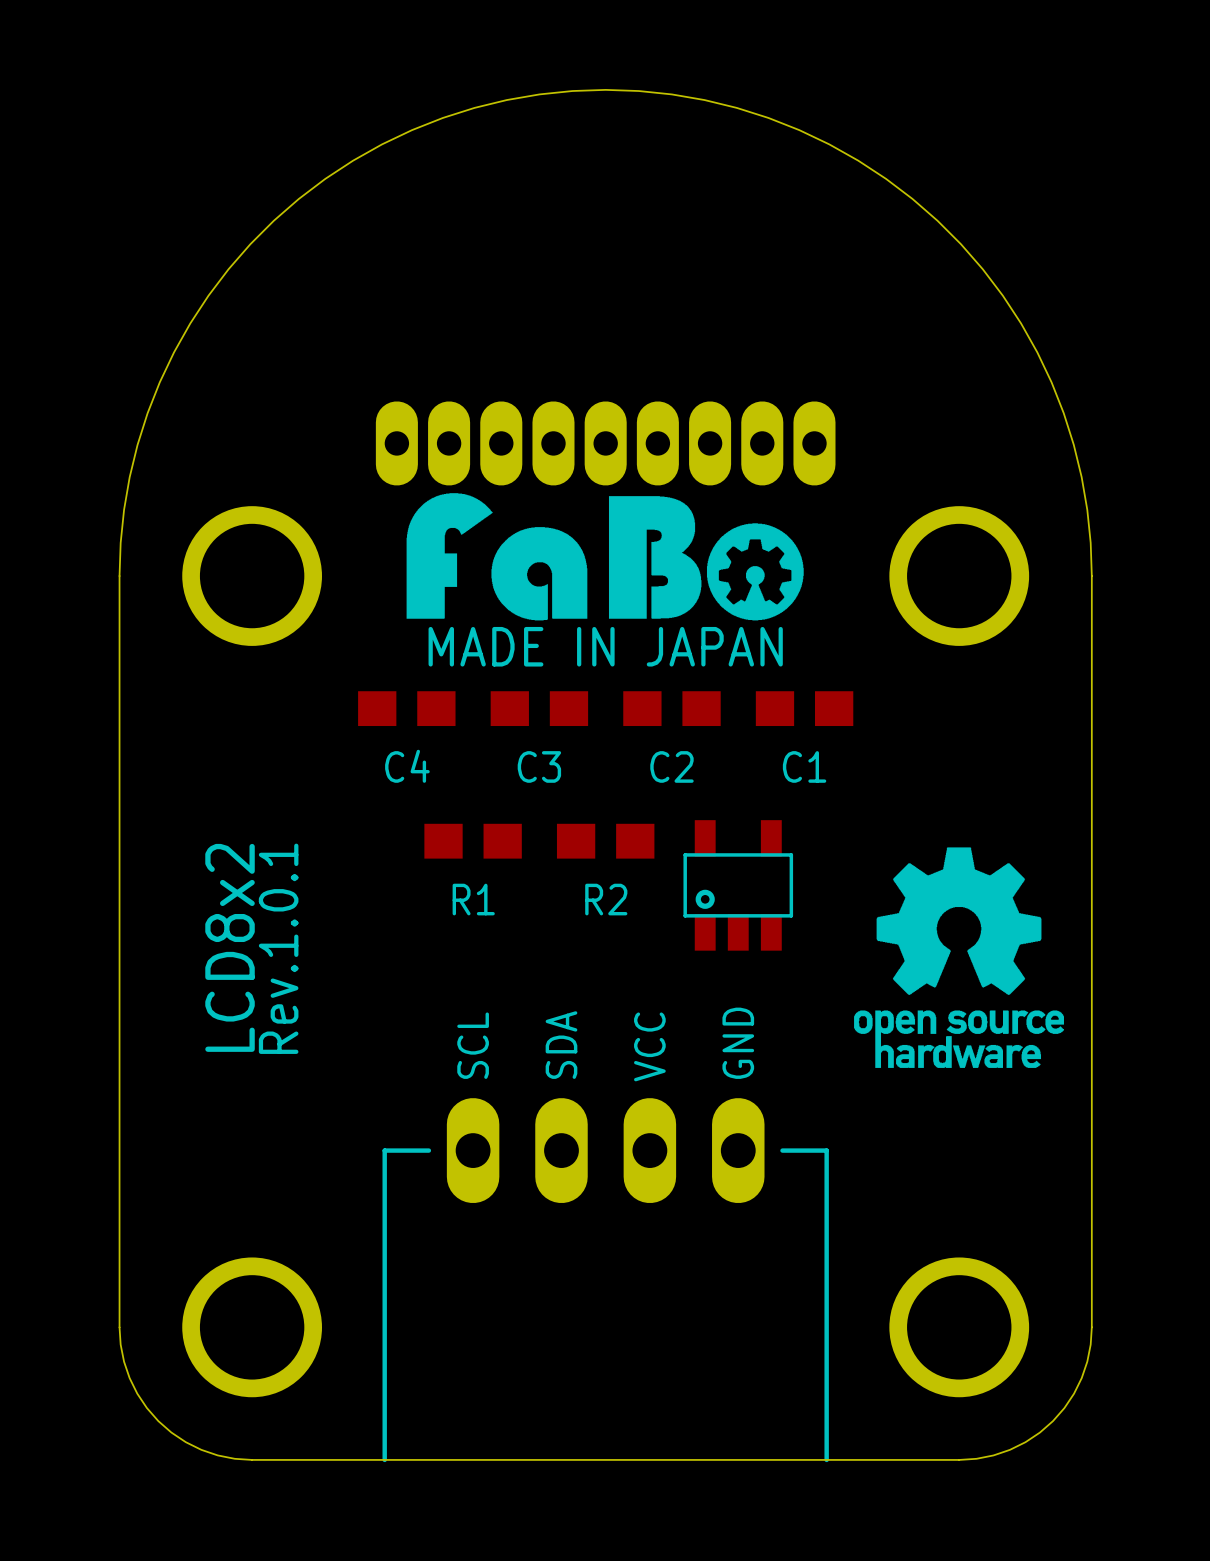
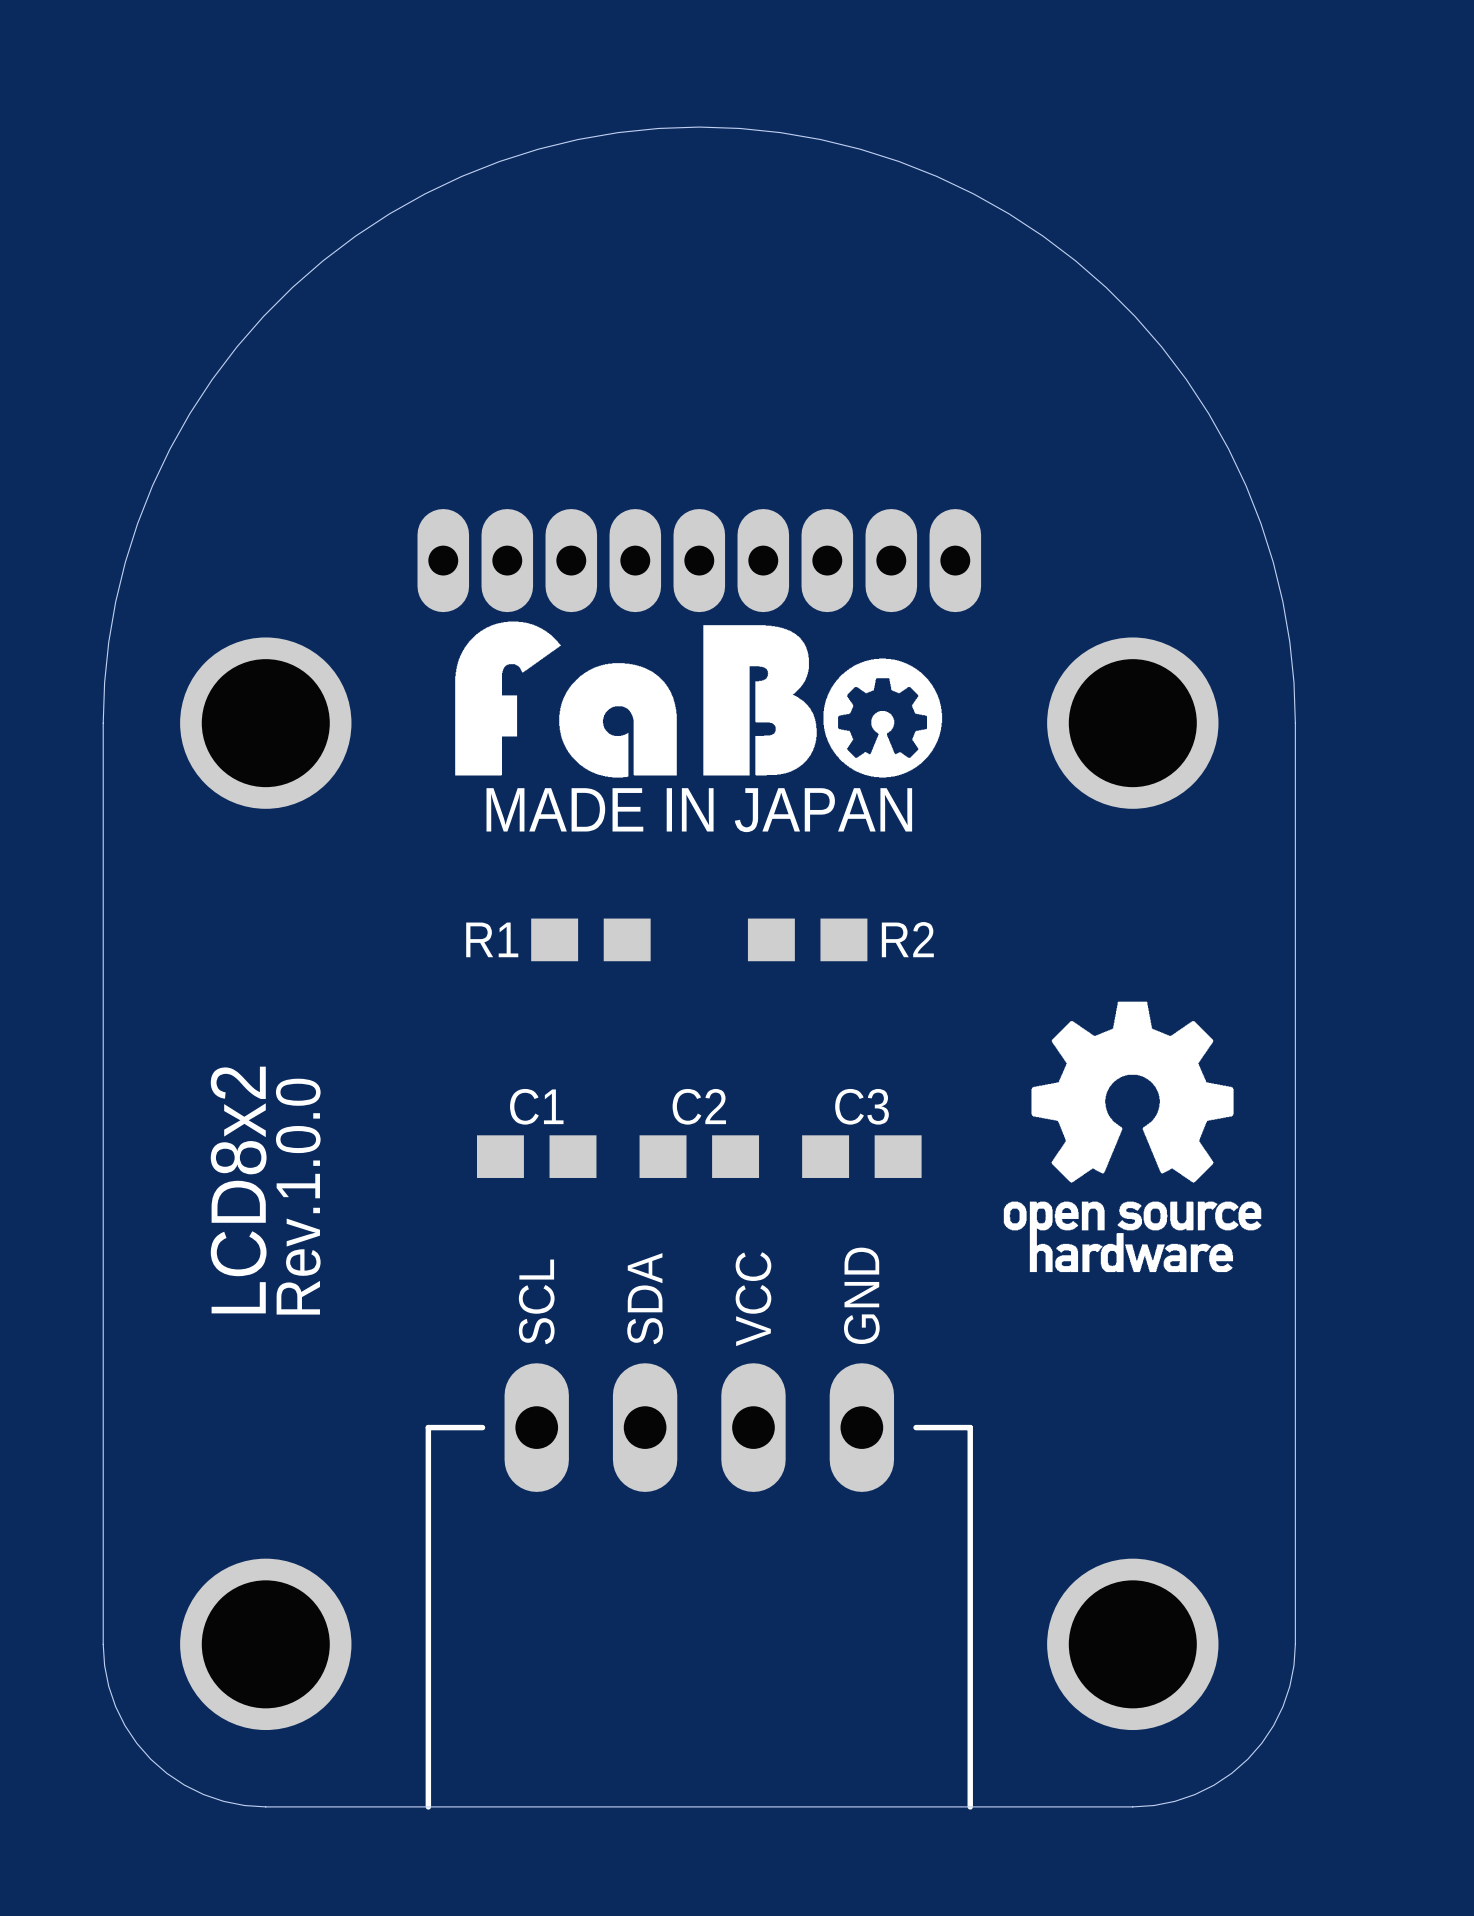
C4: (406, 708) -> none
C3 position: (539, 708) -> (861, 1156)
C2 position: (671, 708) -> (699, 1156)
C1 position: (804, 708) -> (536, 1156)
C3 name position: C3 (539, 766) -> C3 (862, 1106)
C2 name position: C2 (671, 766) -> C2 (699, 1106)
C1 name position: C1 (804, 766) -> C1 (536, 1106)
R1 position: (473, 841) -> (590, 939)
R2 position: (605, 841) -> (807, 939)
part: (738, 885) -> none
R1 name position: R1 (473, 899) -> R1 (492, 939)
R2 name position: R2 (606, 899) -> R2 (907, 939)
text: Rev.1.0.1 (278, 948) -> Rev.1.0.0 (298, 1196)
drawing position: (959, 957) -> (1132, 1136)

